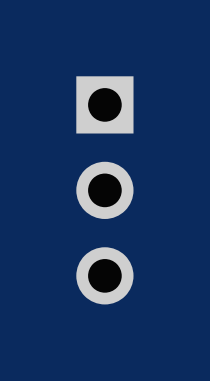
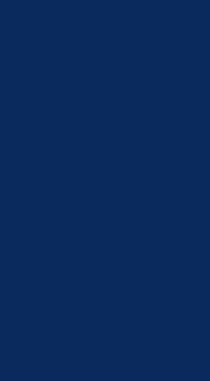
part: (104, 190) -> none

